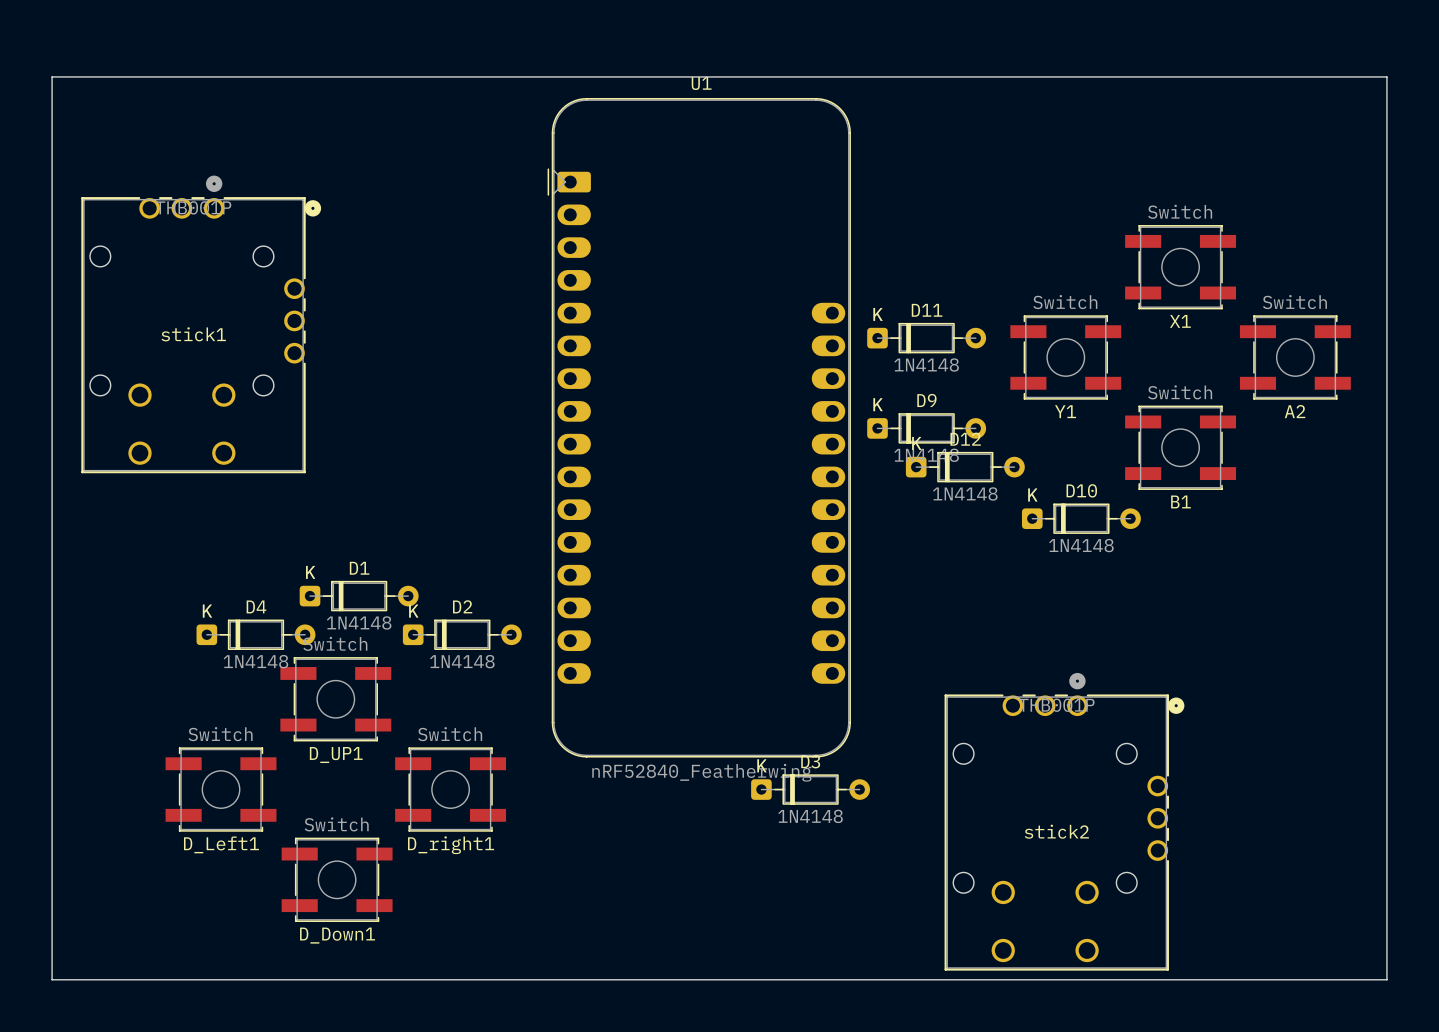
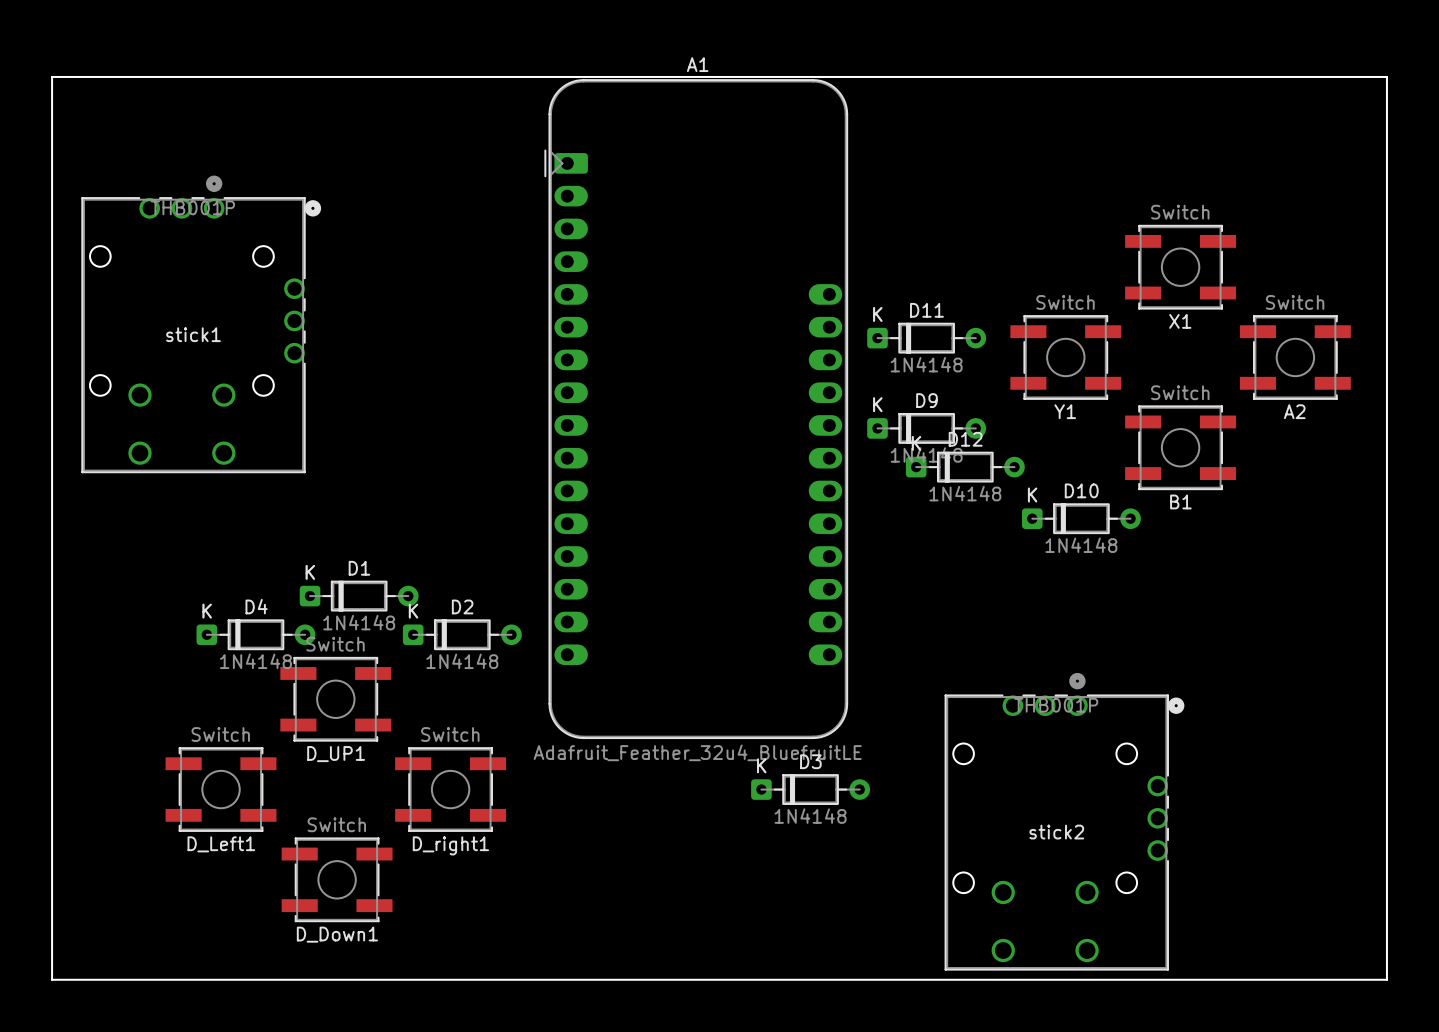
A1: none -> Adafruit_Feather_32u4_BluefruitLE (696, 409)
U1: nRF52840_Featherwing (699, 427) -> none

